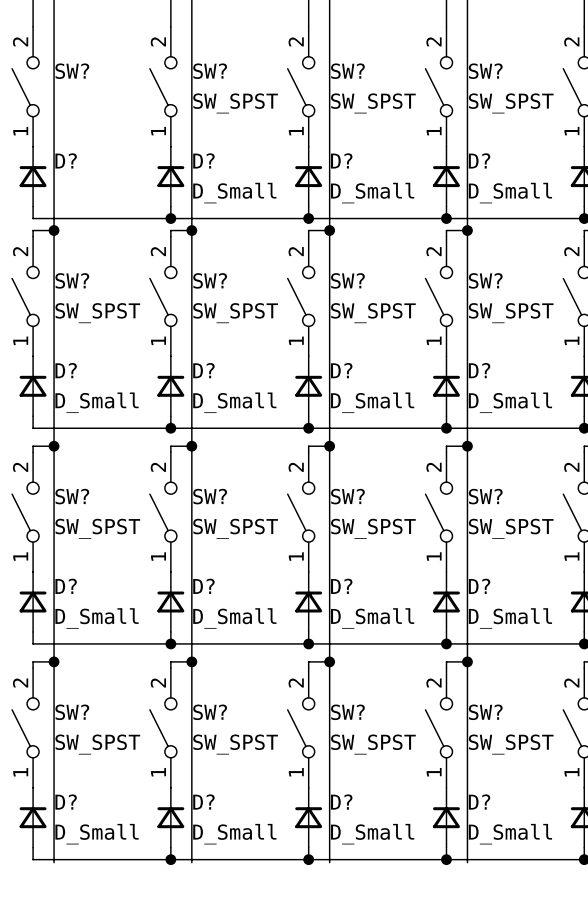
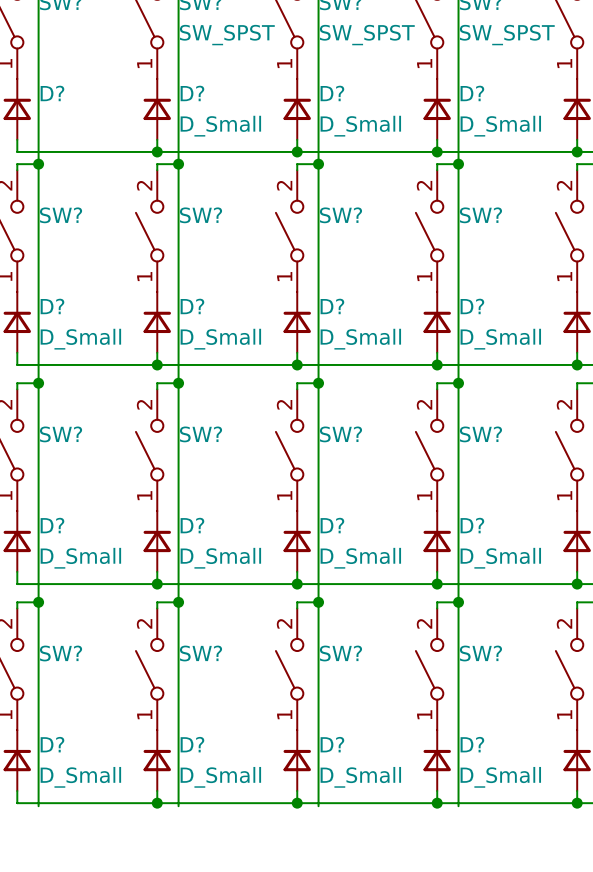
SW? value: SW_SPST (97, 313) -> none
SW? value: SW_SPST (235, 313) -> none
SW? value: SW_SPST (373, 313) -> none
SW? value: SW_SPST (511, 313) -> none
SW? value: SW_SPST (97, 528) -> none
SW? value: SW_SPST (235, 528) -> none
SW? value: SW_SPST (373, 528) -> none
SW? value: SW_SPST (511, 528) -> none
SW? value: SW_SPST (97, 744) -> none
SW? value: SW_SPST (235, 744) -> none
SW? value: SW_SPST (373, 744) -> none
SW? value: SW_SPST (511, 744) -> none

